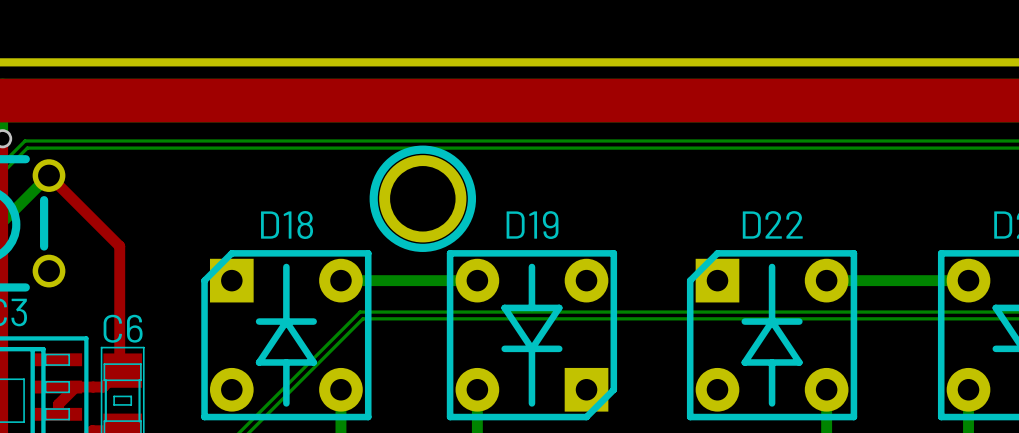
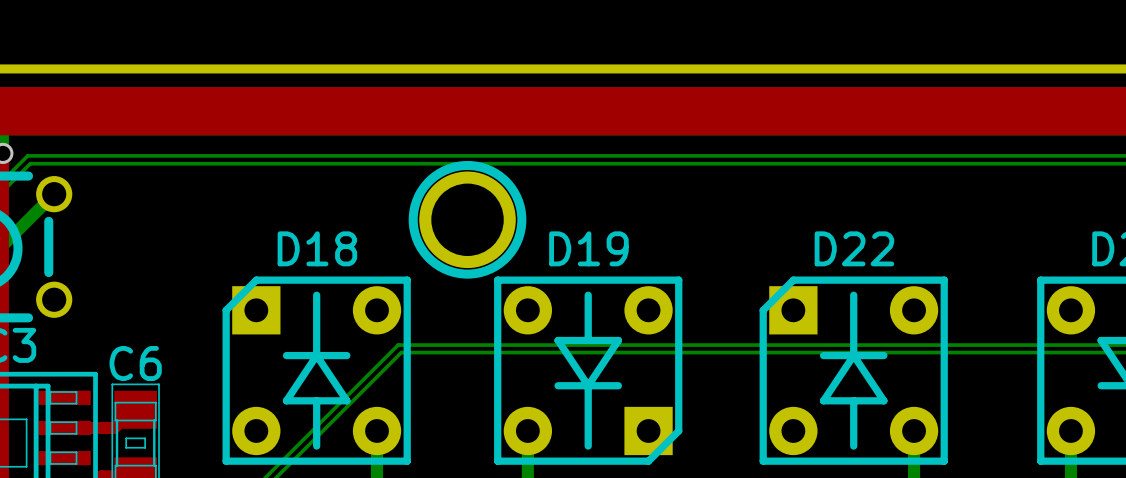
top track: (49, 175) (119, 246) (119, 370) (122, 370) -> none
bottom track: (340, 280) (477, 280) -> none
bottom track: (826, 280) (968, 280) -> none
top track: (75, 387) (58, 404) (58, 414) -> none

